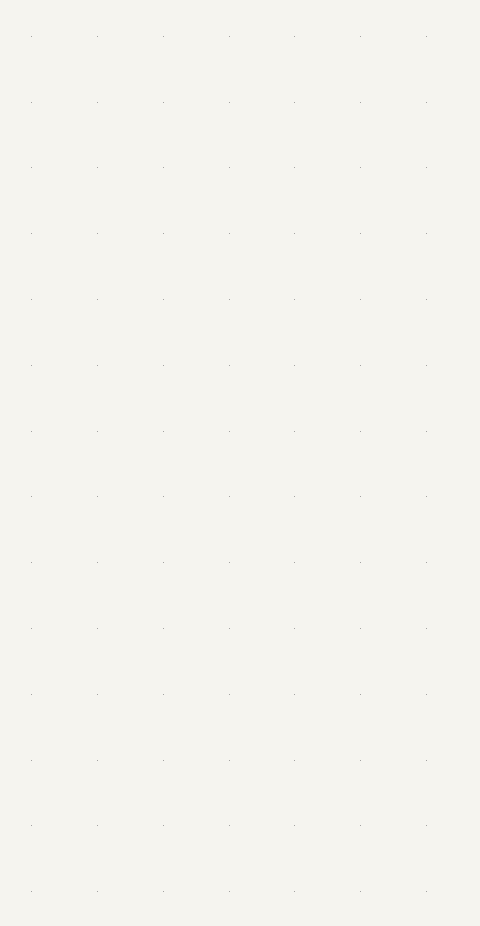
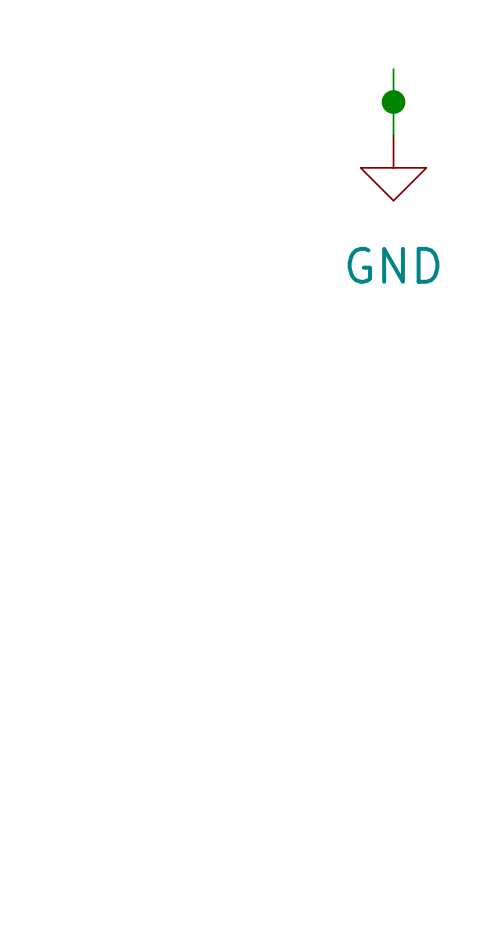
wire: none -> (393, 69) (393, 134)
junction: none -> (393, 102)
power symbol: none -> GND (393, 167)

